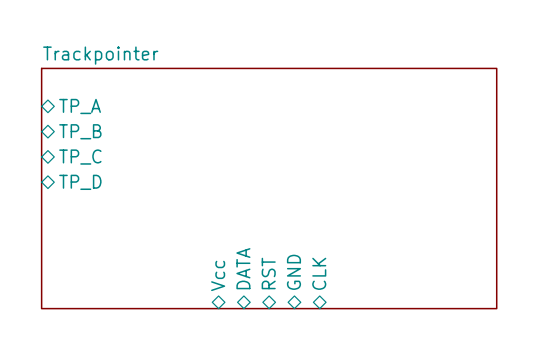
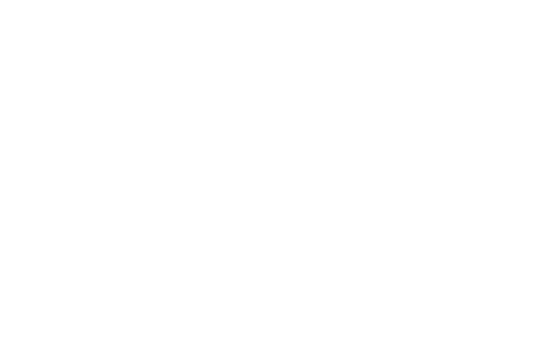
sheet pin: TP_A (80, 106) -> none
sheet pin: TP_B (80, 131) -> none
sheet pin: TP_C (80, 157) -> none
sheet pin: TP_D (80, 182) -> none
sheet Trackpointer: (269, 188) -> none
sheet pin: DATA (243, 268) -> none
sheet pin: GND (293, 272) -> none
sheet pin: RST (268, 273) -> none
sheet pin: CLK (319, 273) -> none
sheet pin: Vcc (218, 275) -> none

